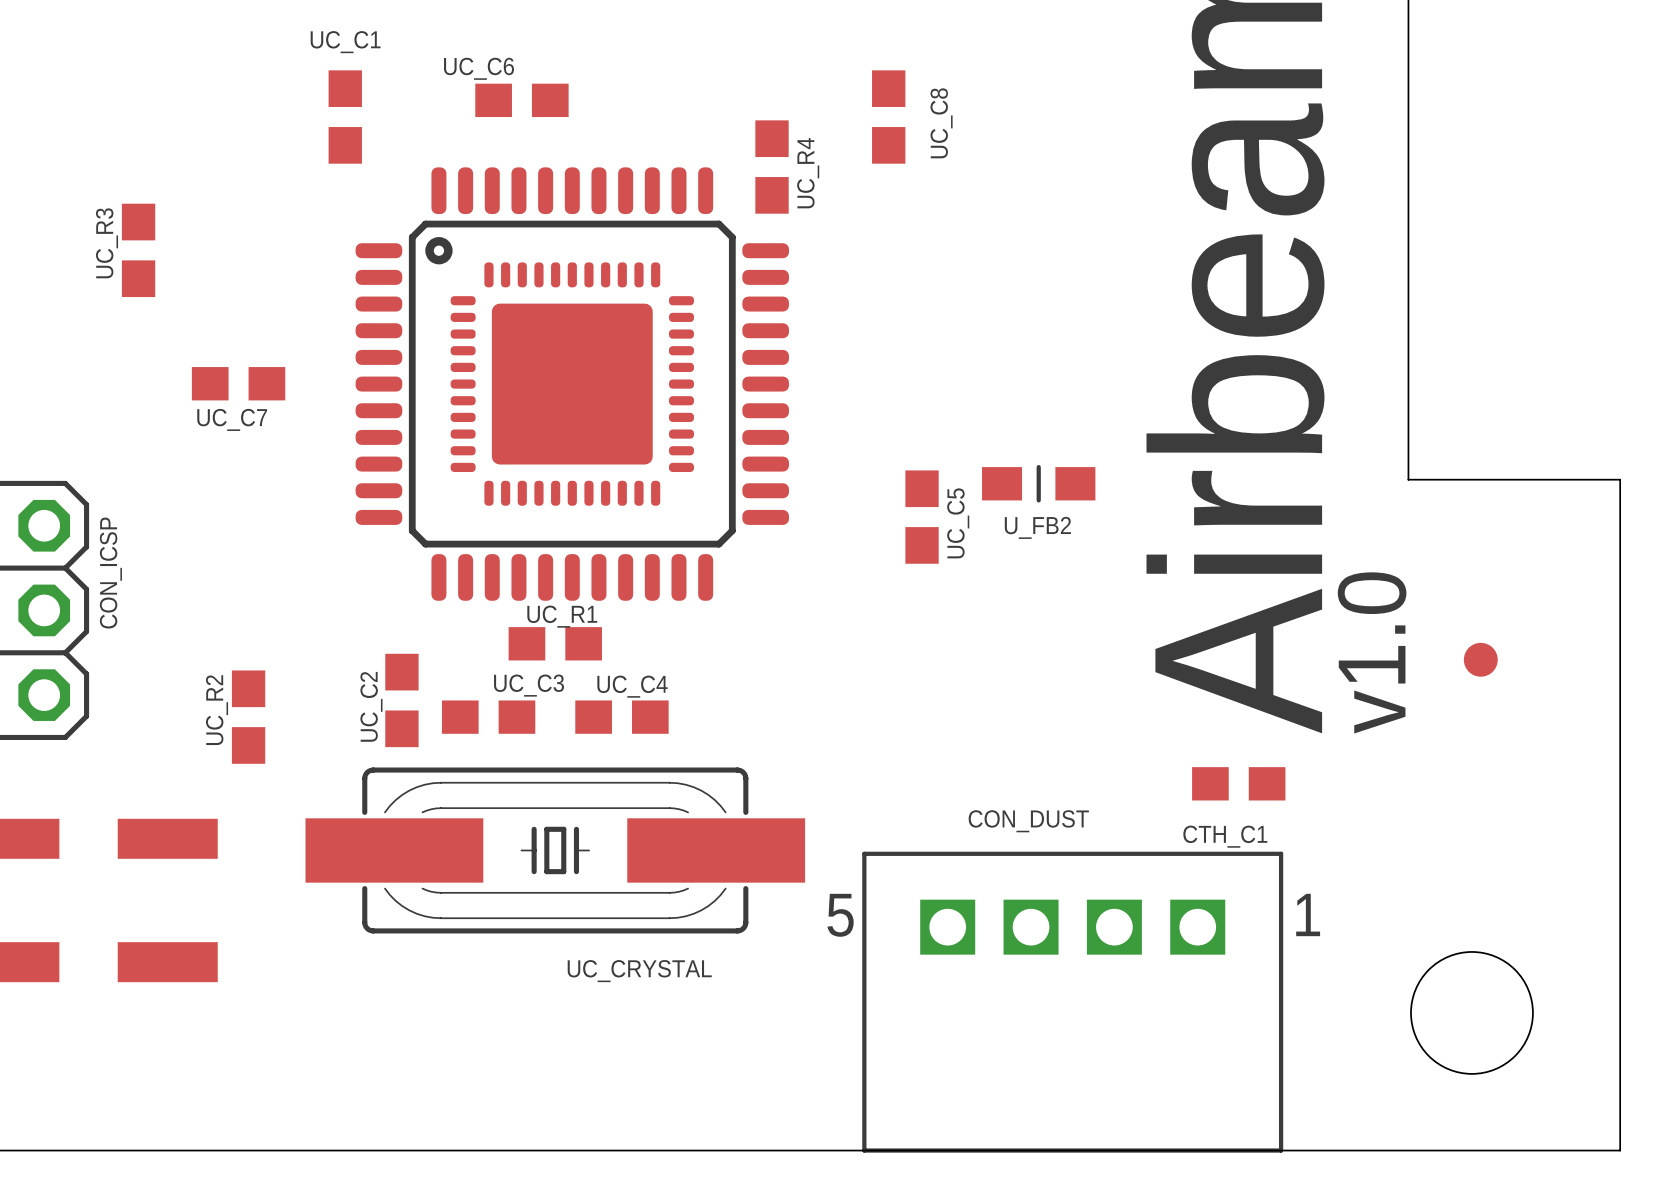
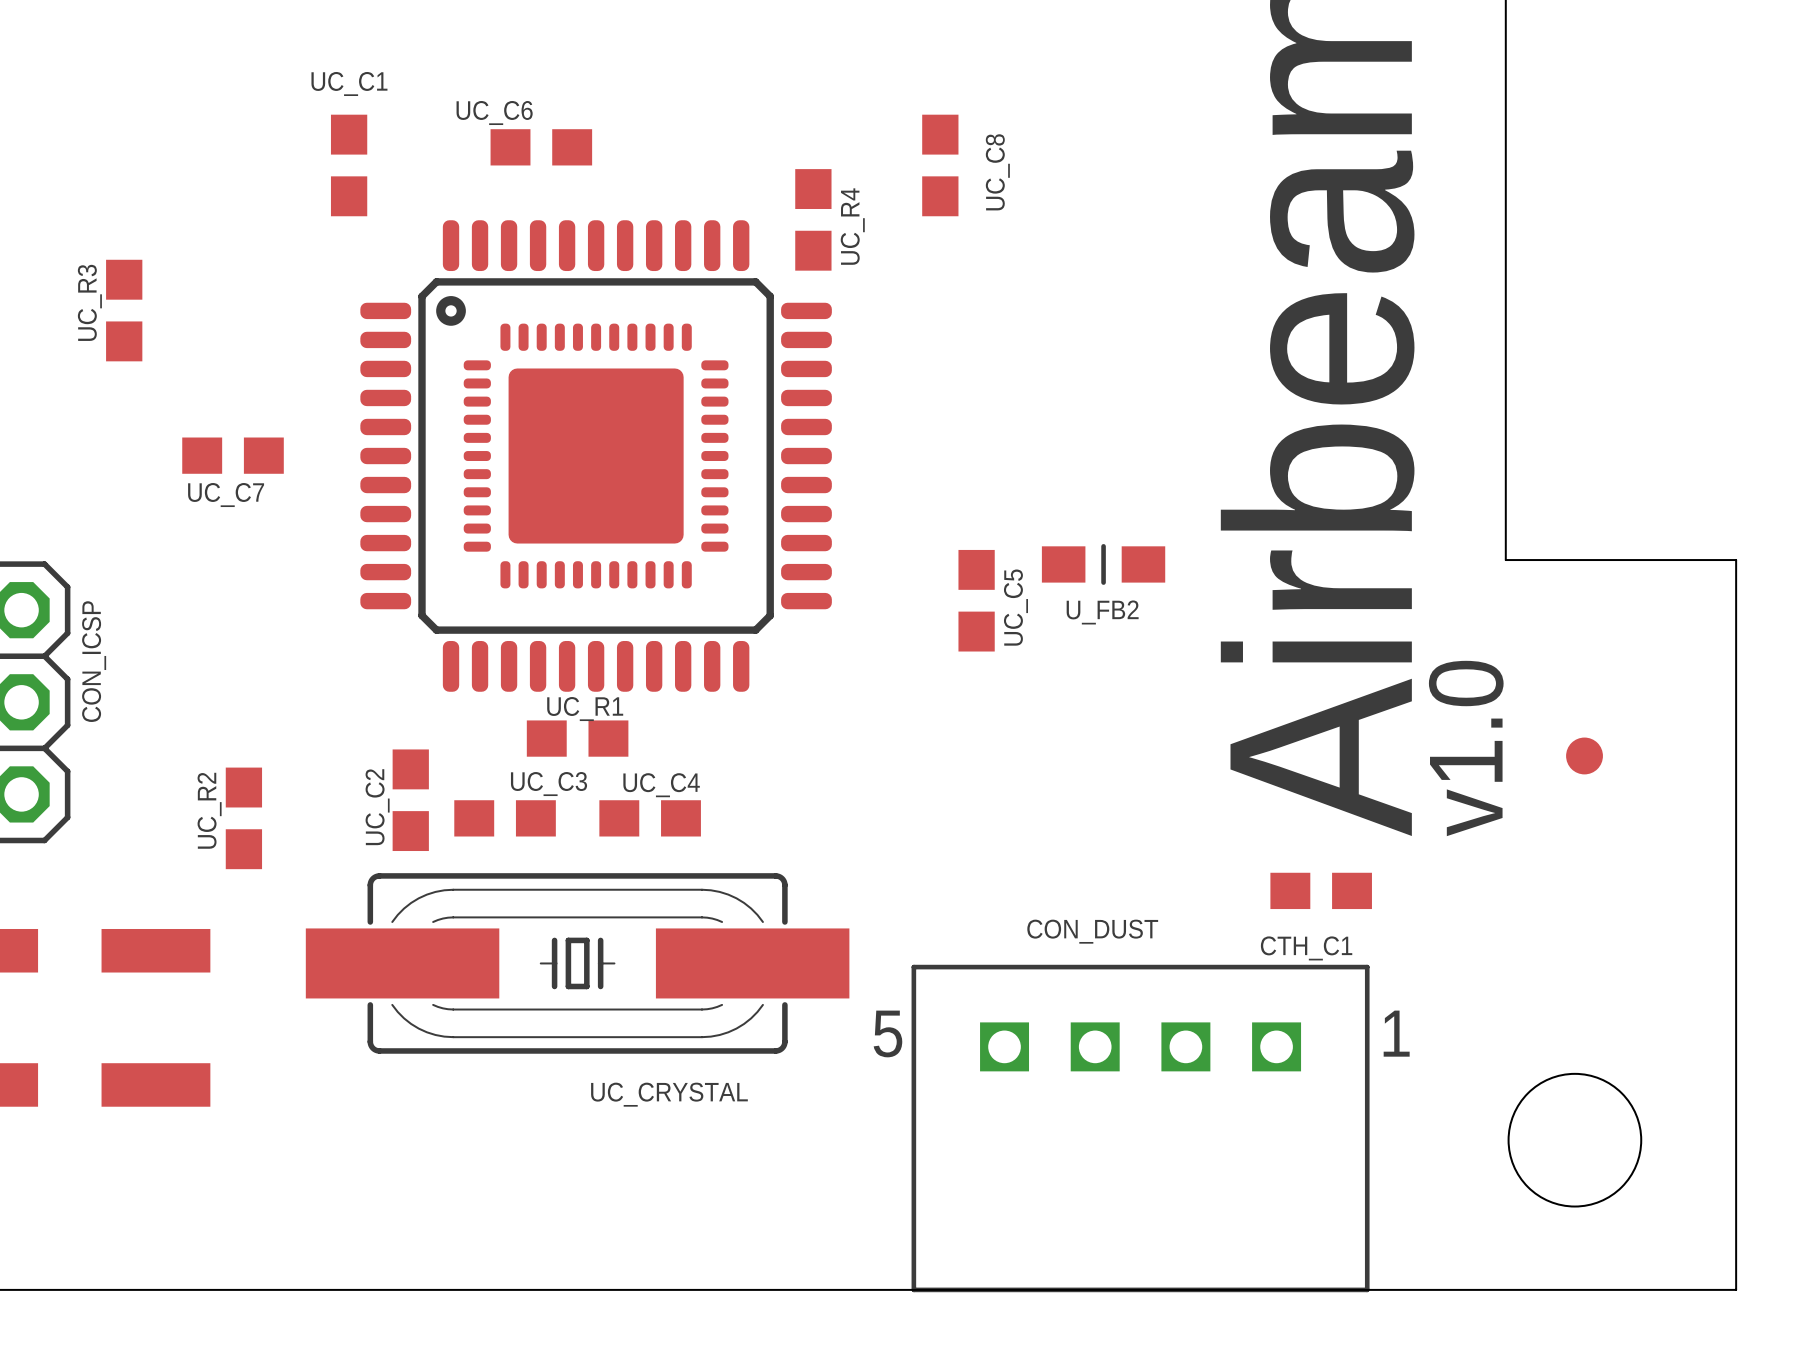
CON_DUST footprint: [862, 851, 1284, 1153] -> [911, 964, 1370, 1293]

